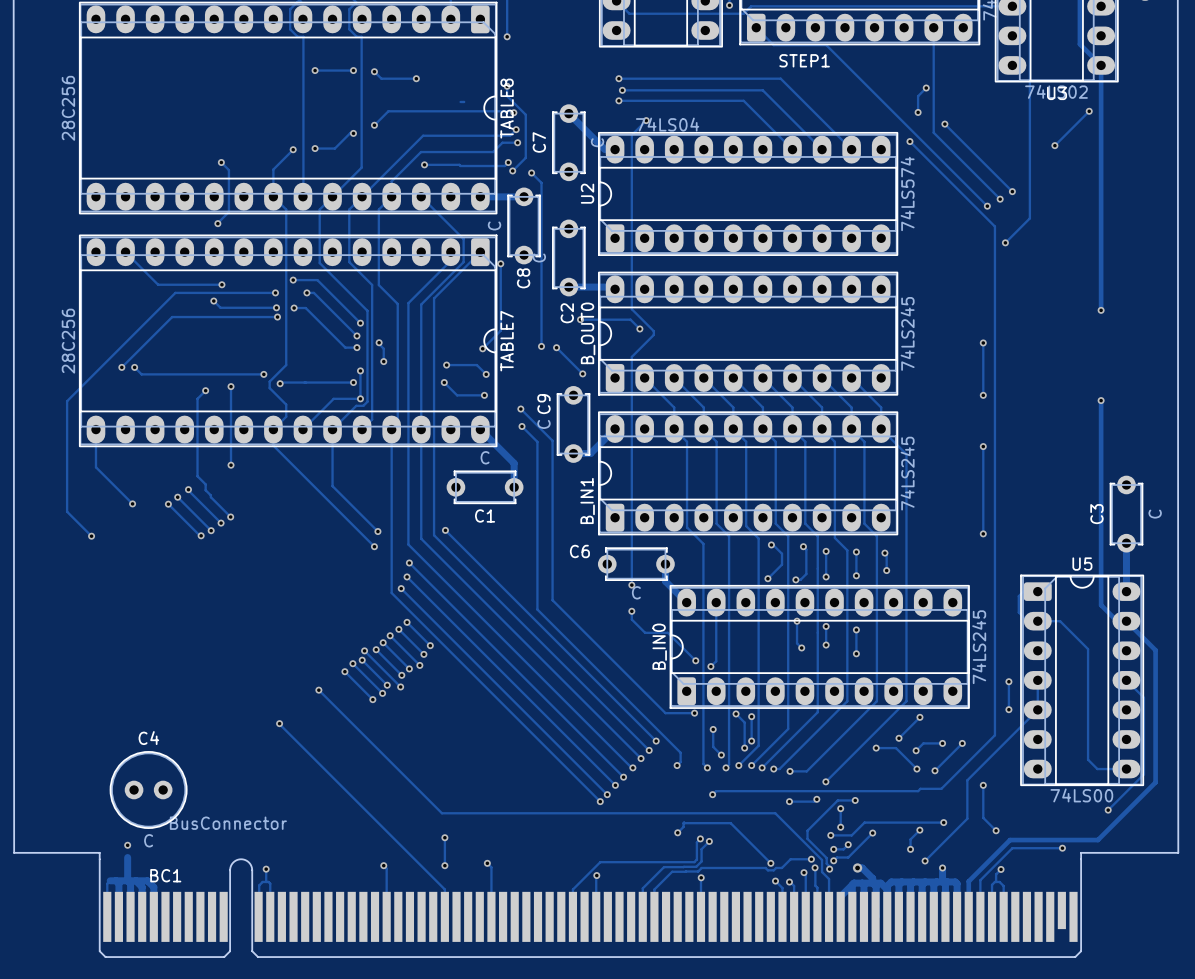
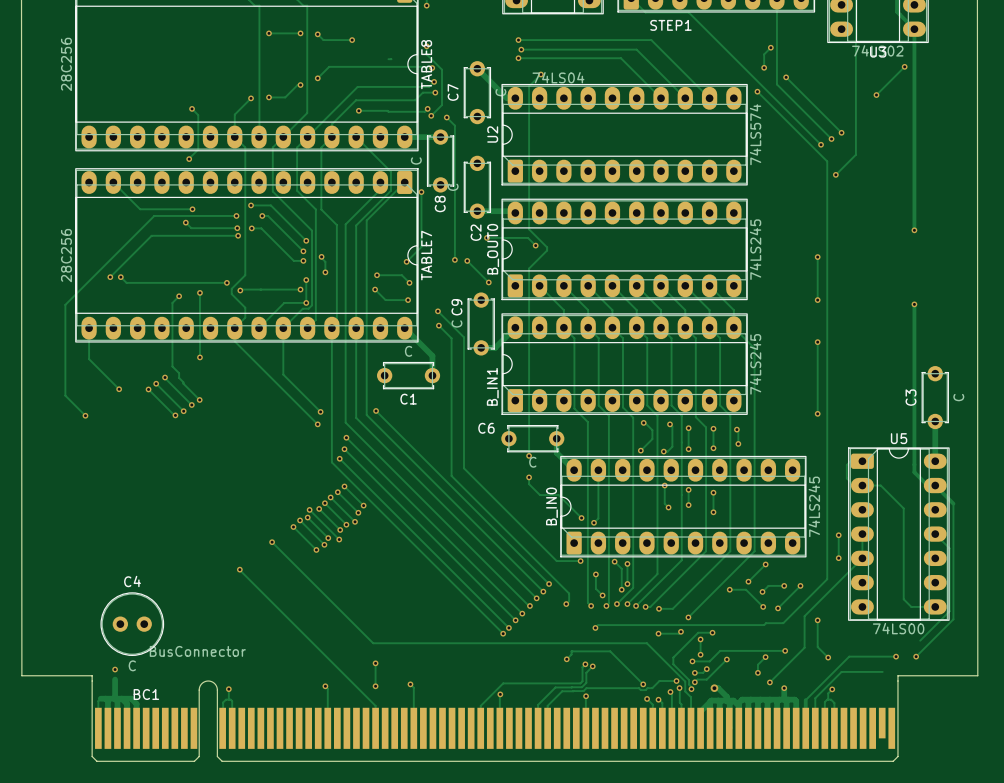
track: (1148, 643) (1155, 650) (1155, 782) (1097, 840) (1010, 840) (968, 882) -> (953, 503) (953, 619) (916, 656)
via: (1108, 810) -> none
track: none -> (896, 656) (849, 656) (805, 700)
via: none -> (896, 656)
via: none -> (916, 656)
via: (1062, 848) -> none

